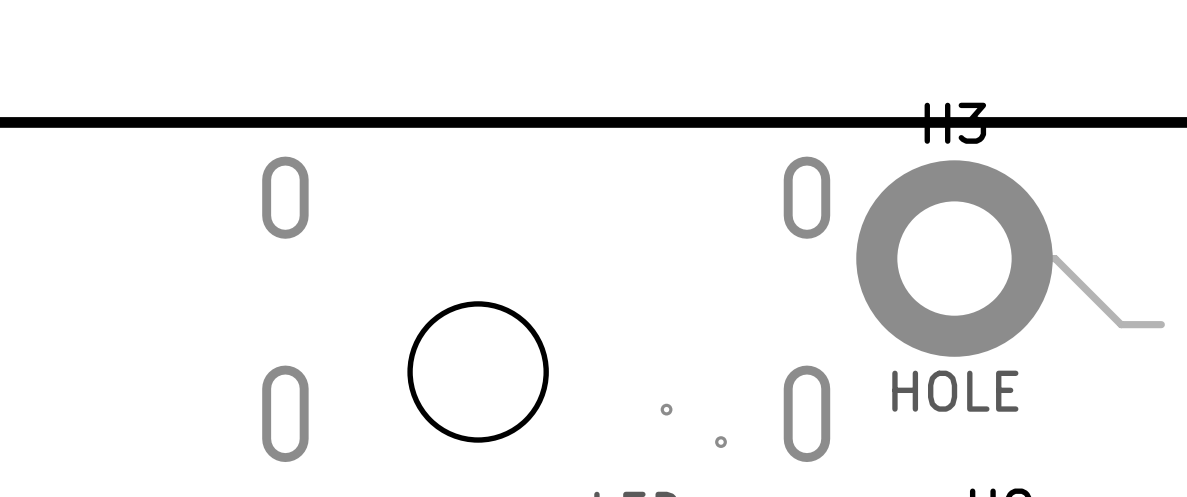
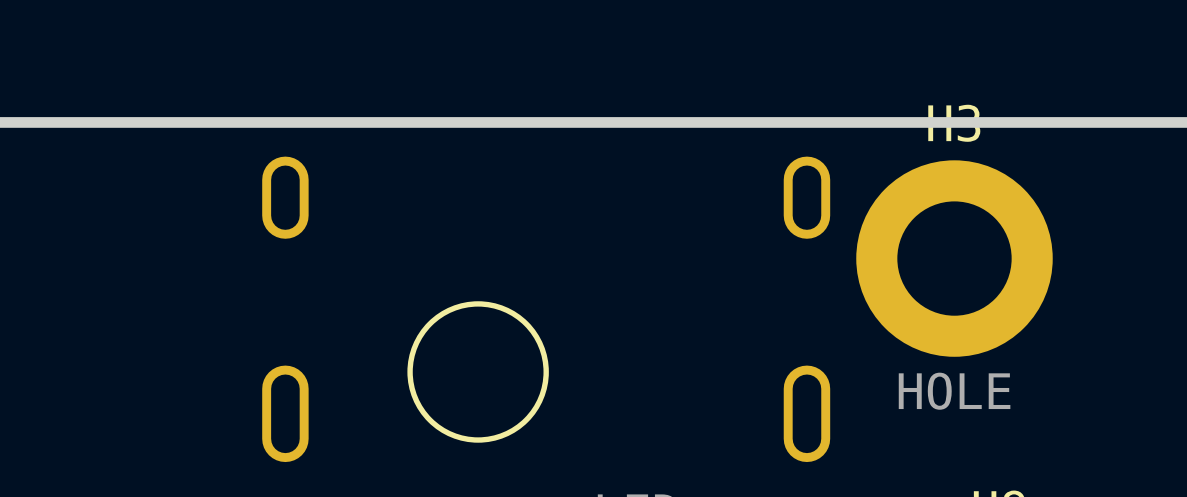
track: (954, 258) (1055, 258) (1121, 324) (1161, 324) -> none
via: (666, 409) -> none
via: (721, 442) -> none

